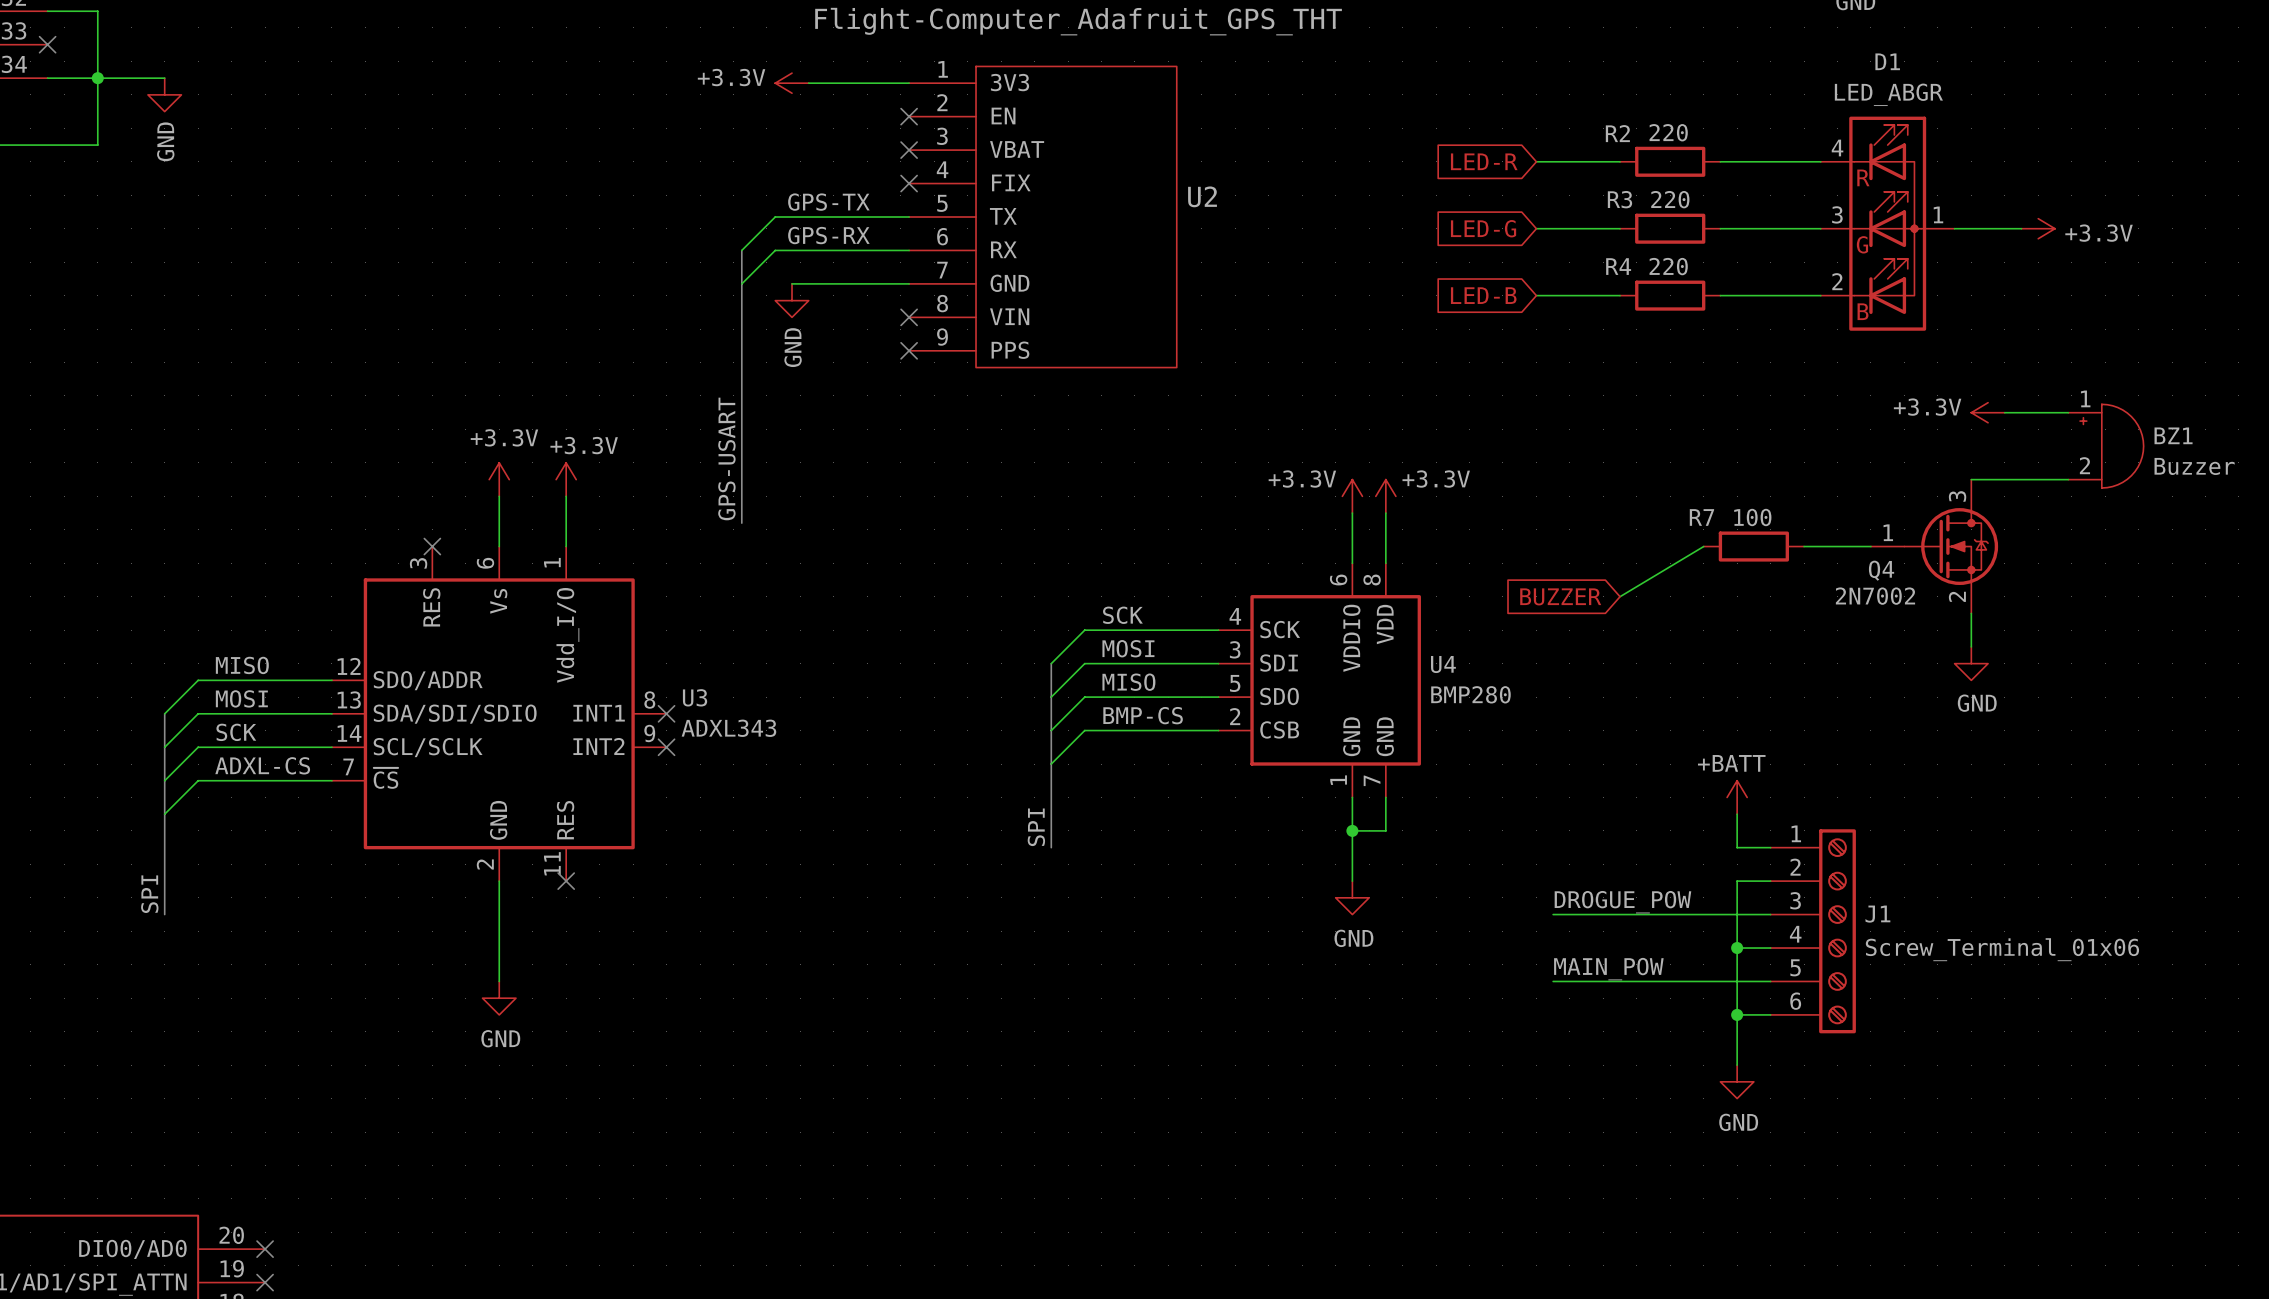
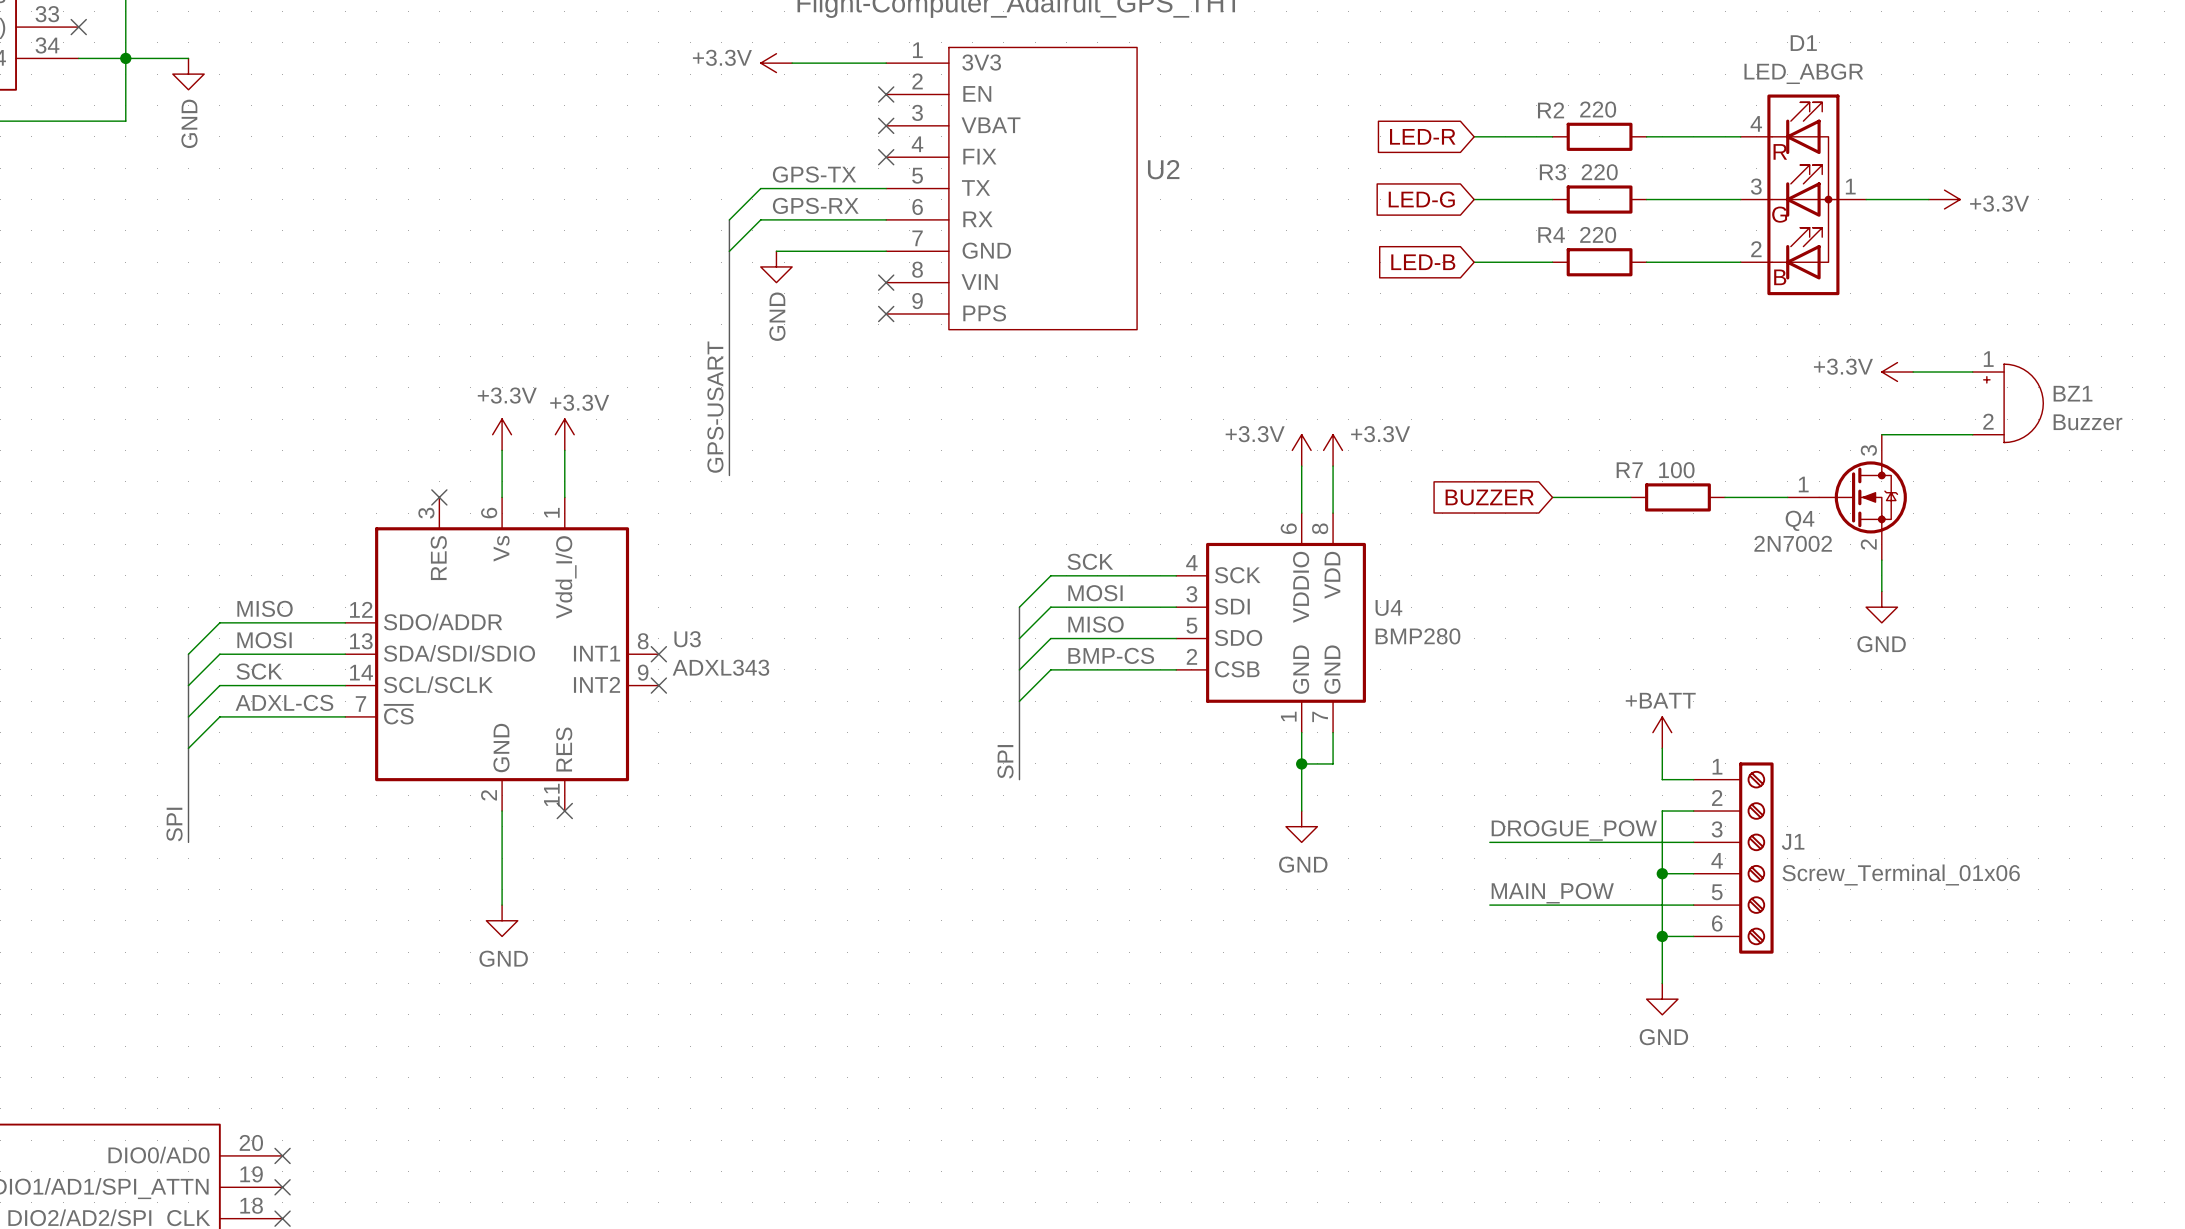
wire: (1703, 546) (1620, 596) -> (1630, 497) (1552, 497)
global label position: BUZZER (1560, 596) -> BUZZER (1489, 497)

